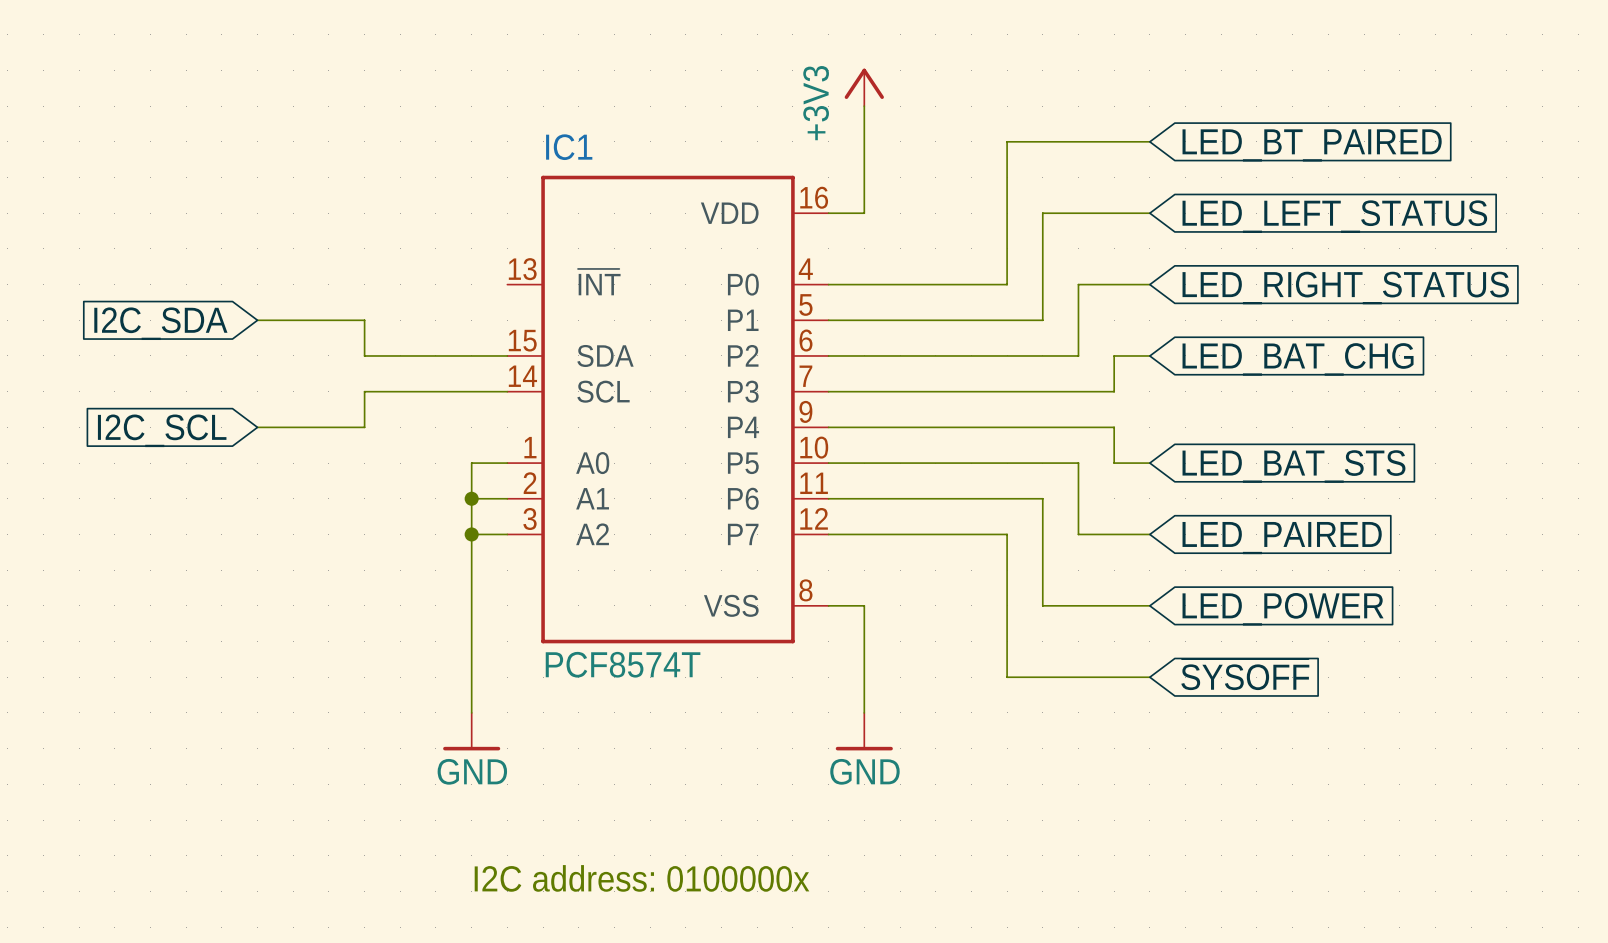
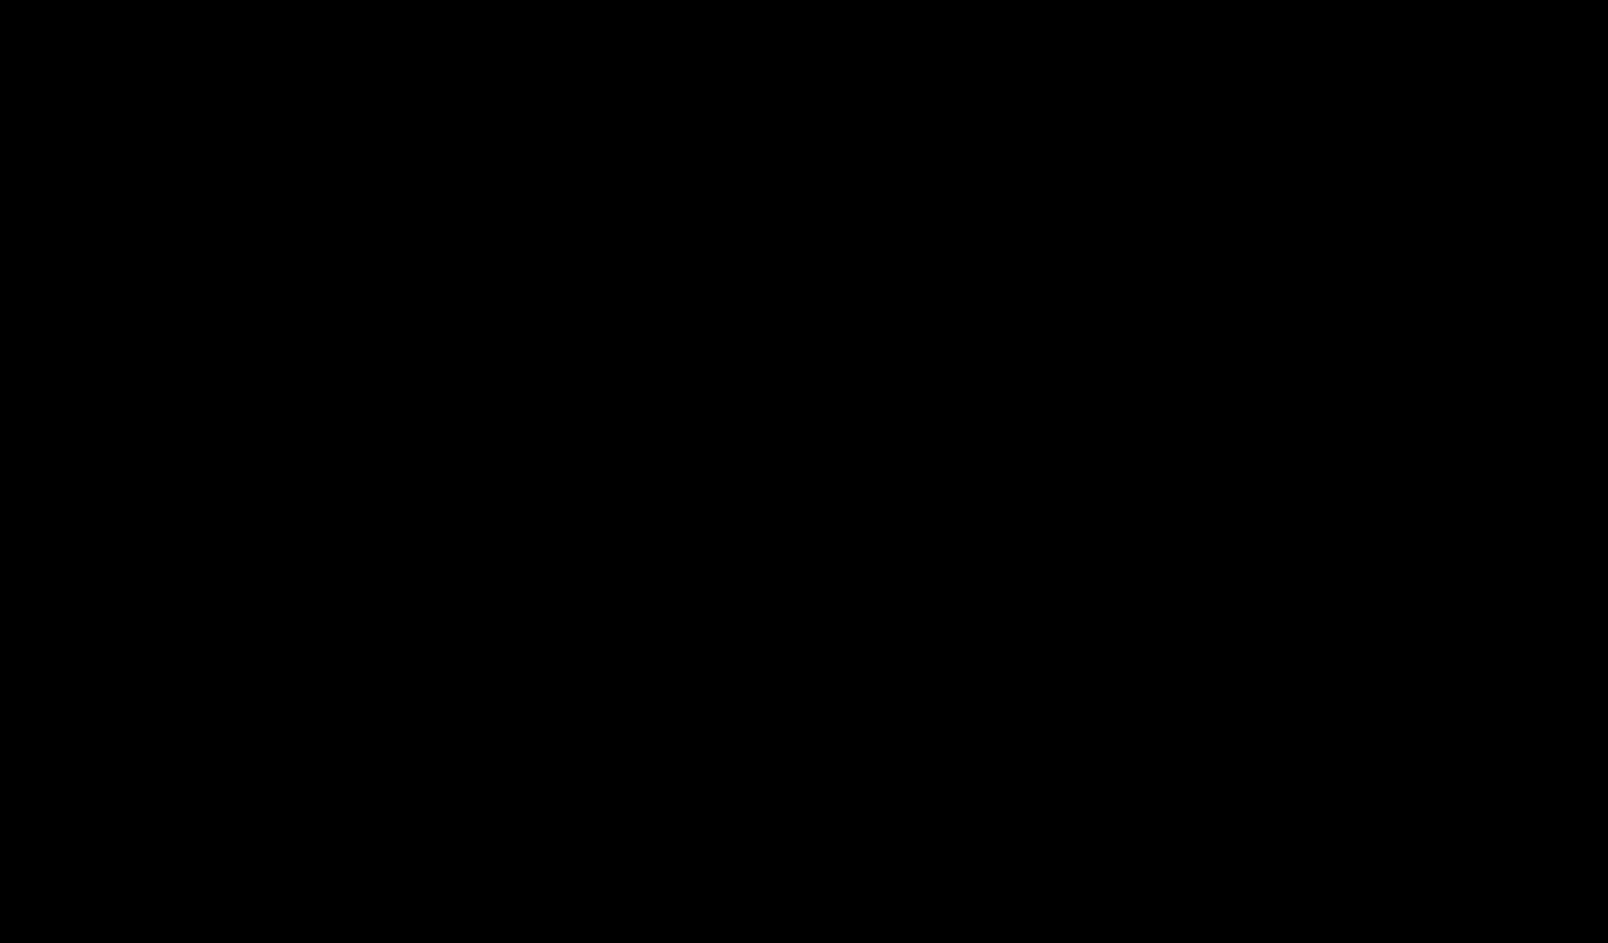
power symbol: +3V3 (864, 87) -> none
wire: (864, 106) (864, 213) (828, 213) -> none
wire: (1149, 141) (1007, 141) (1007, 284) (828, 284) -> none
global label: LED_BT_PAIRED (1312, 145) -> none
wire: (1149, 213) (1042, 213) (1042, 320) (828, 320) -> none
global label: LED_LEFT_STATUS (1334, 216) -> none
wire: (1149, 284) (1078, 284) (1078, 355) (828, 355) -> none
global label: LED_RIGHT_STATUS (1345, 288) -> none
wire: (257, 320) (364, 320) (364, 355) (507, 355) -> none
global label: I2C_SDA (160, 323) -> none
wire: (1149, 355) (1114, 355) (1114, 391) (828, 391) -> none
global label: LED_BAT_CHG (1298, 359) -> none
wire: (507, 391) (364, 391) (364, 427) (257, 427) -> none
IC1: PCF8574T (667, 409) -> none
wire: (828, 427) (1114, 427) (1114, 463) (1149, 463) -> none
global label: I2C_SCL (162, 430) -> none
wire: (507, 463) (471, 463) (471, 712) -> none
wire: (828, 463) (1078, 463) (1078, 534) (1149, 534) -> none
global label: LED_BAT_STS (1293, 466) -> none
wire: (471, 498) (507, 498) -> none
junction: (471, 498) -> none
wire: (828, 498) (1042, 498) (1042, 605) (1149, 605) -> none
wire: (471, 534) (507, 534) -> none
junction: (471, 534) -> none
wire: (828, 534) (1007, 534) (1007, 677) (1149, 677) -> none
global label: LED_PAIRED (1282, 538) -> none
wire: (828, 605) (864, 605) (864, 712) -> none
global label: LED_POWER (1283, 609) -> none
global label: ~{SYSOFF} (1245, 674) -> none
power symbol: GND (471, 731) -> none
power symbol: GND (864, 731) -> none
text: I2C address: 0100000x (642, 878) -> none

